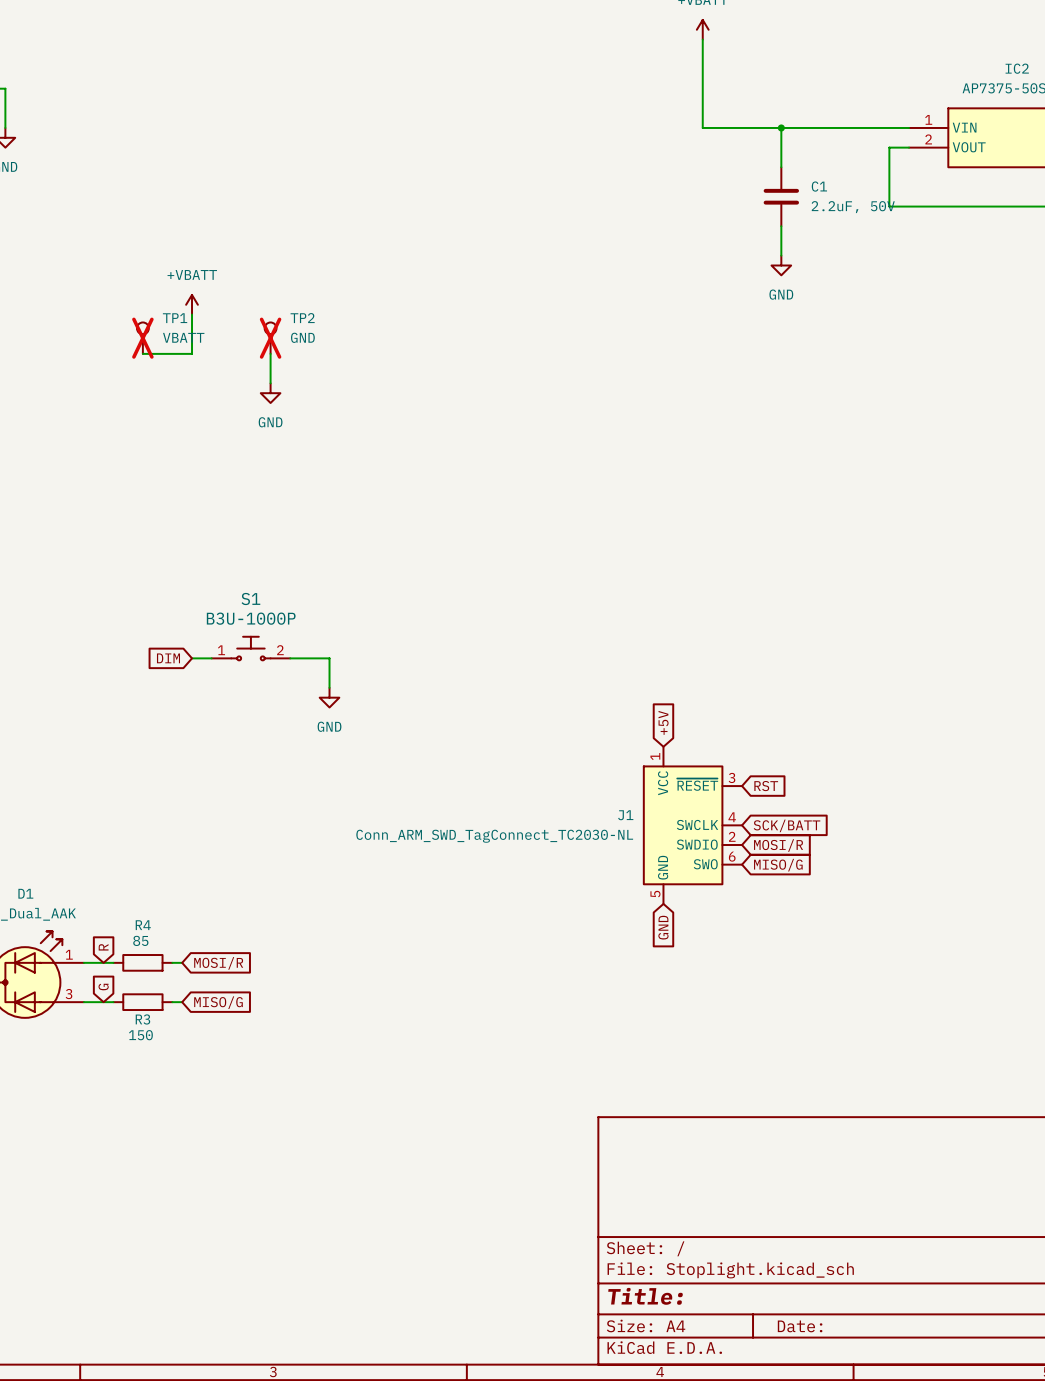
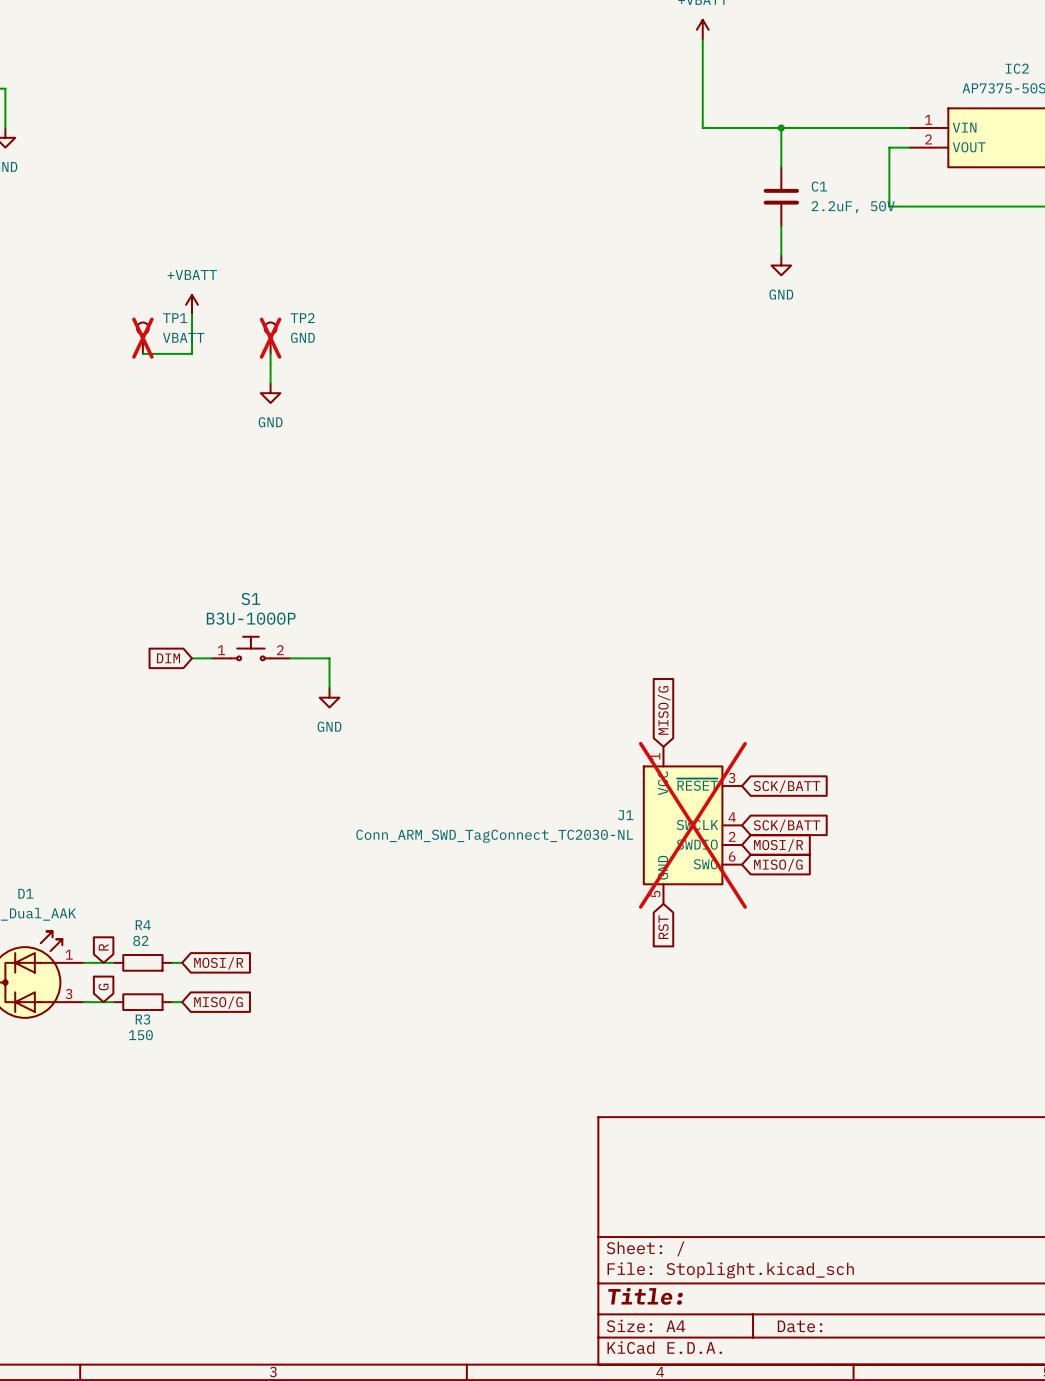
global label: +5V (663, 722) -> MISO/G (664, 710)
global label: RST (766, 786) -> SCK/BATT (787, 786)
J1 do-not-place cross: none -> (692, 825)
global label: GND (663, 927) -> RST (663, 927)
R4 value: 85 (140, 940) -> 82 (140, 940)

